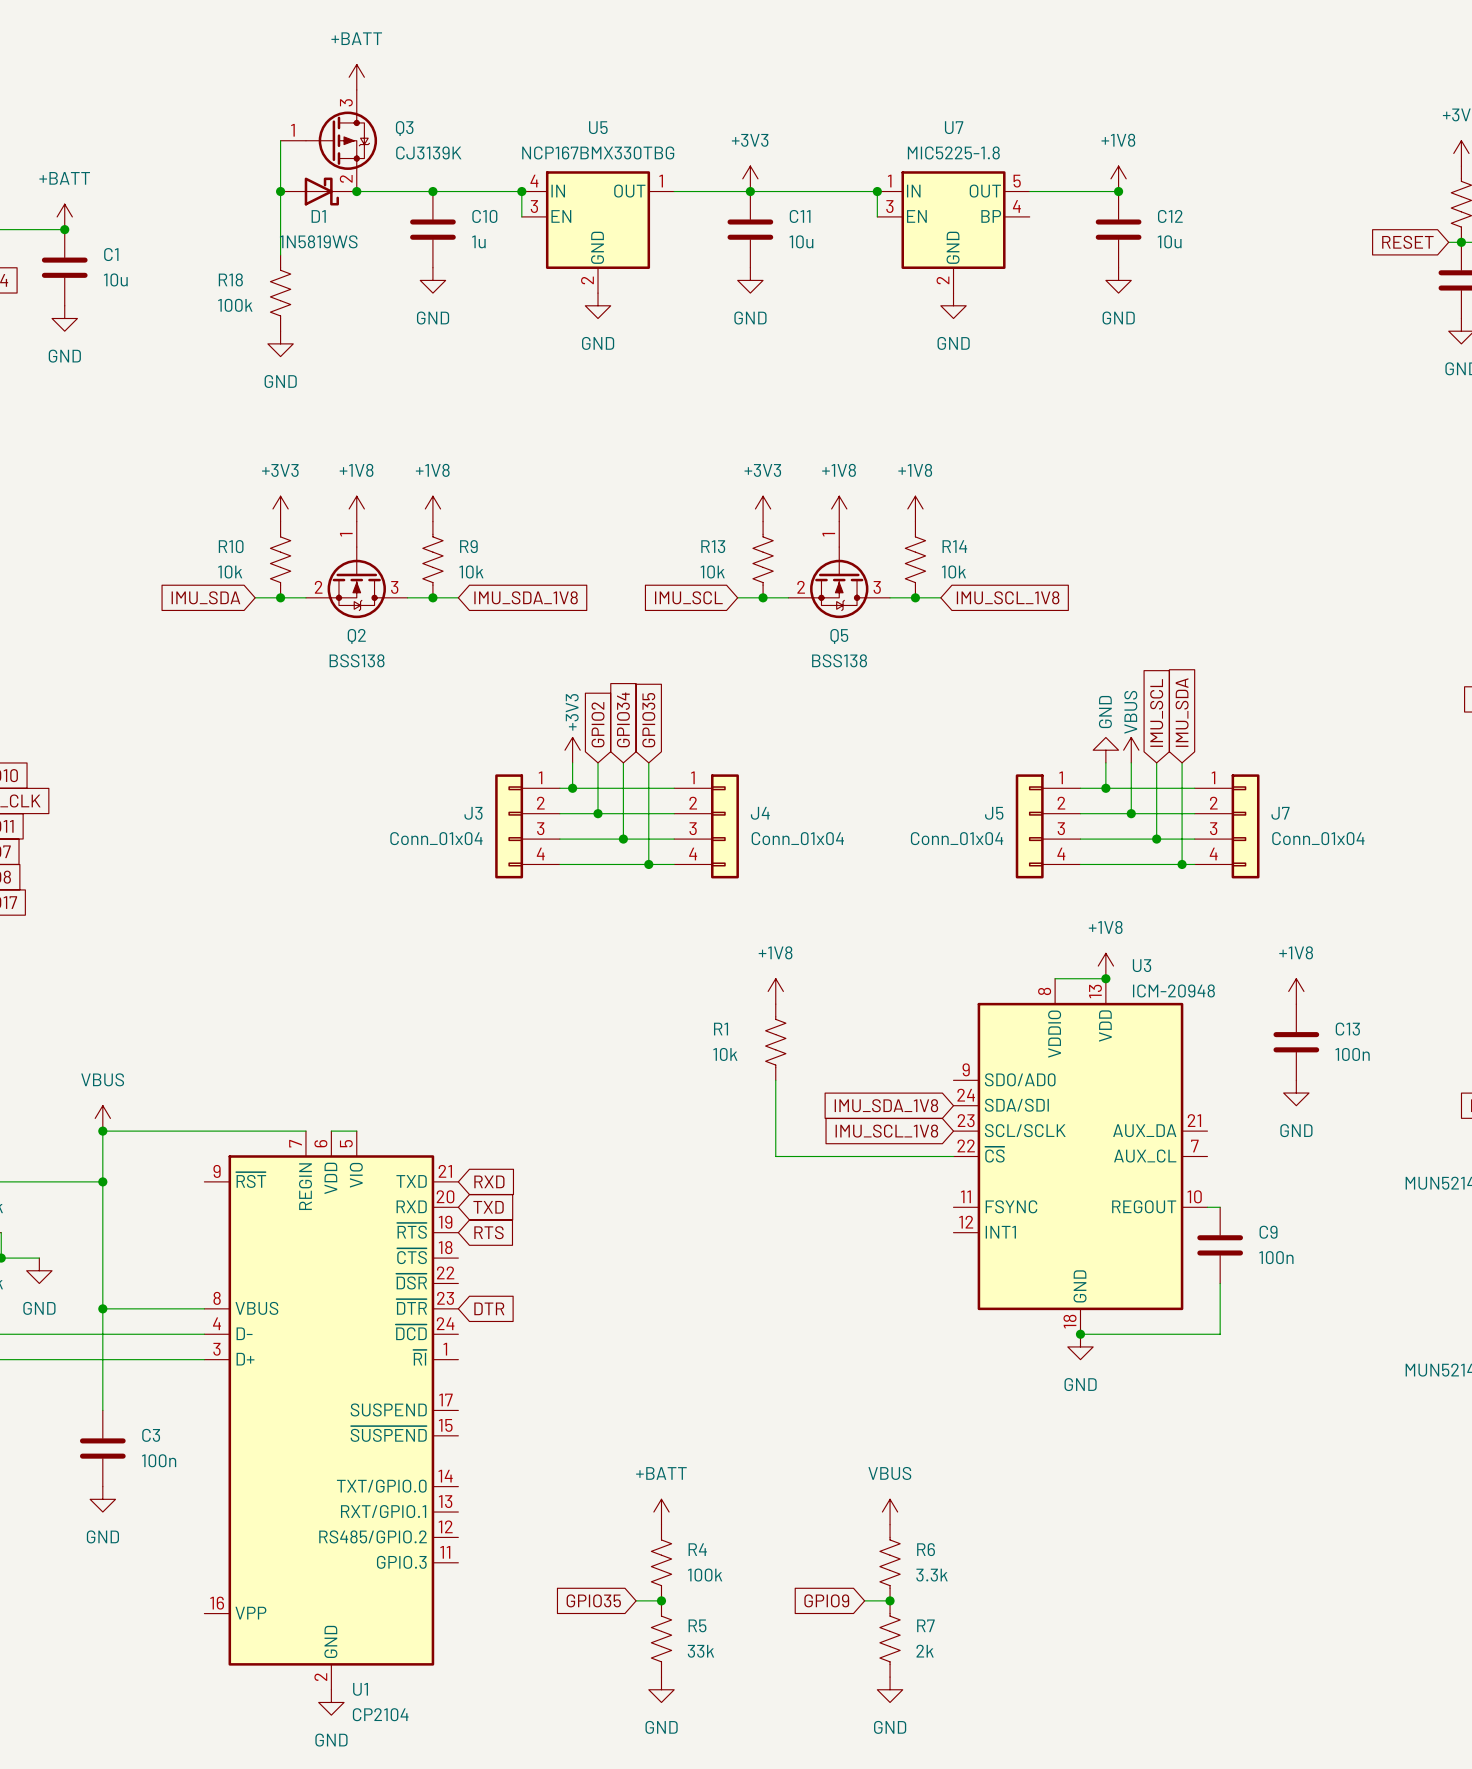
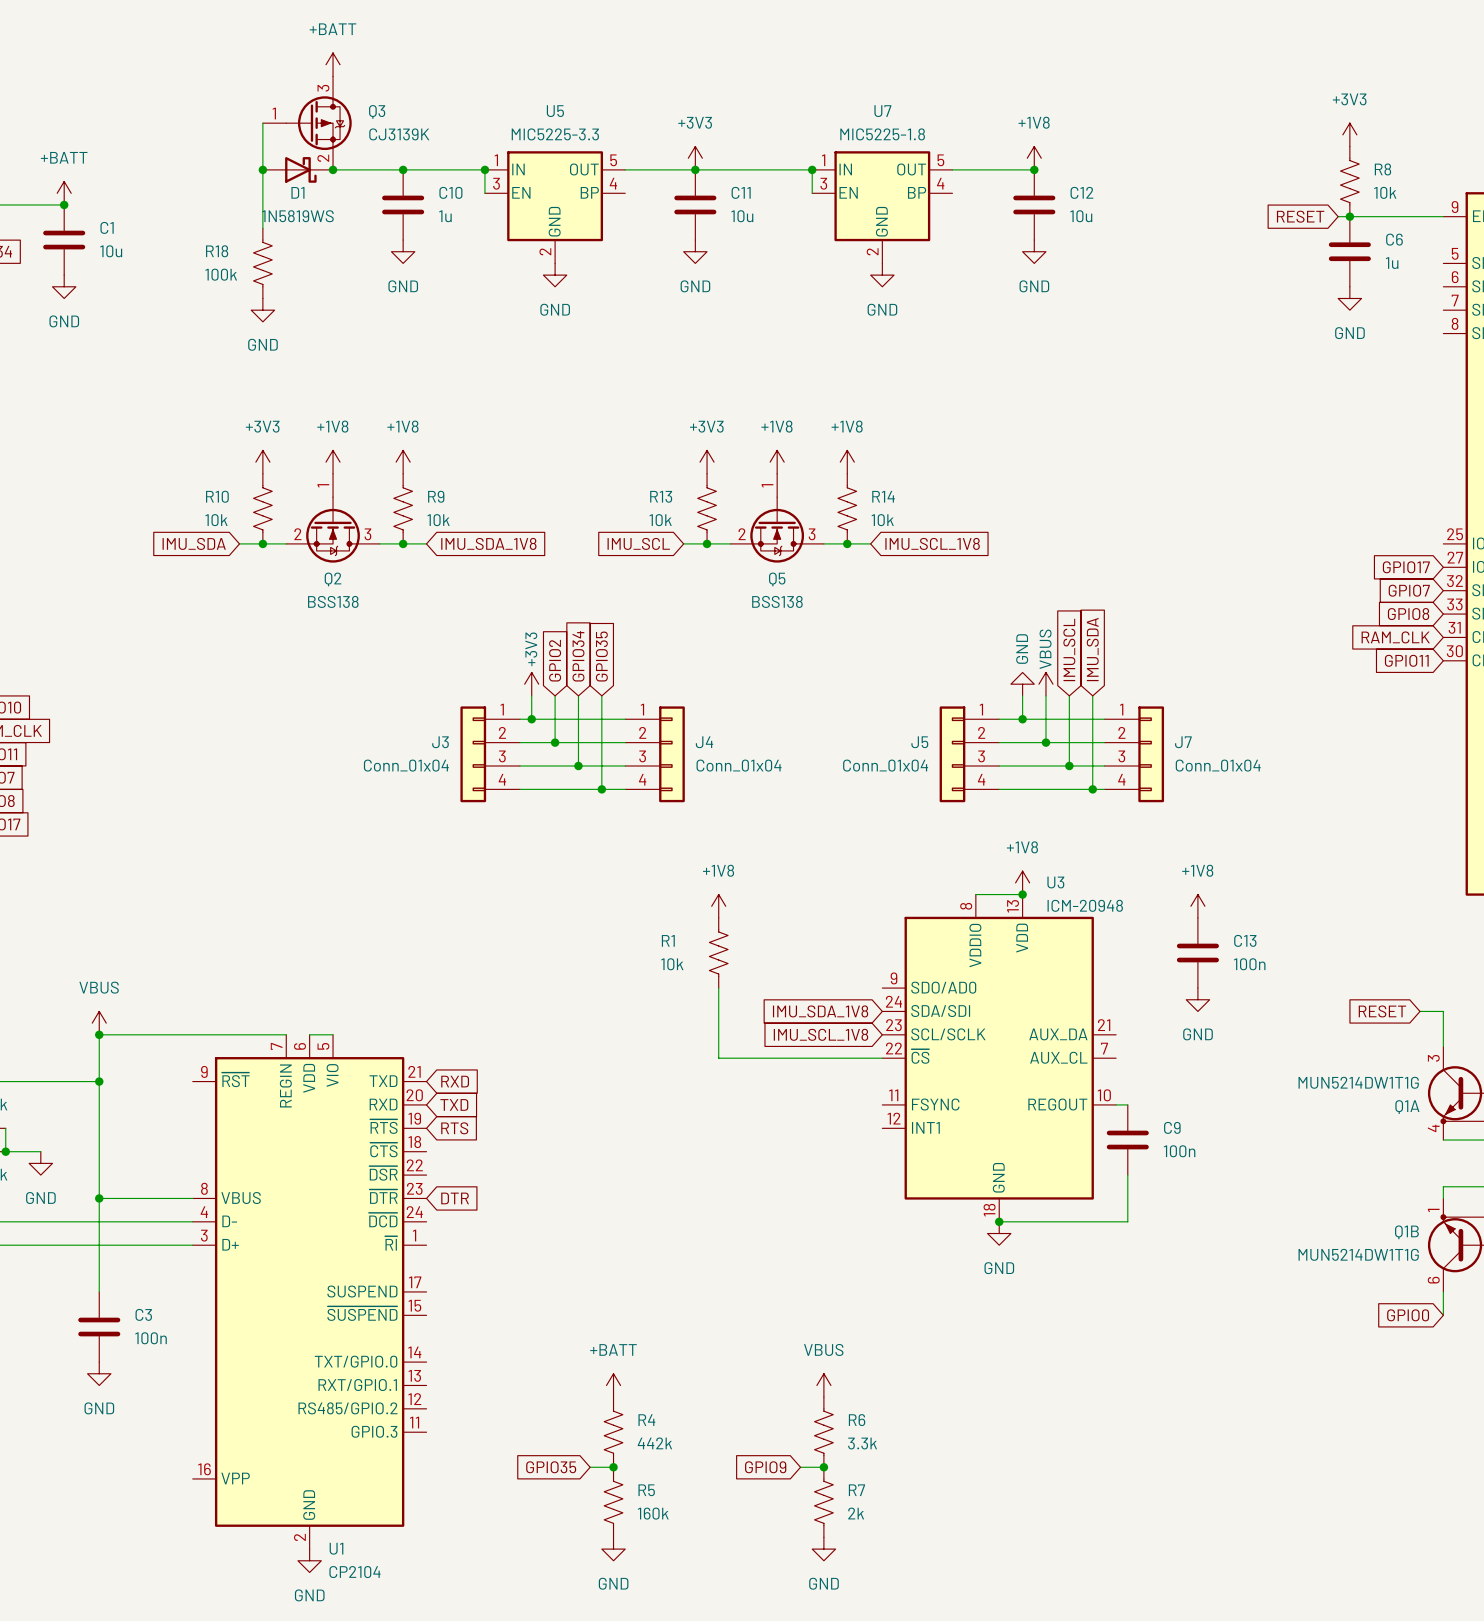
U5 value: NCP167BMX330TBG (598, 152) -> MIC5225-3.3 (555, 134)
U5 symbol: [521, 171, 675, 294] -> [484, 151, 626, 264]
R4 value: 100k (705, 1575) -> 442k (654, 1443)
R5 value: 33k (700, 1651) -> 160k (653, 1513)

